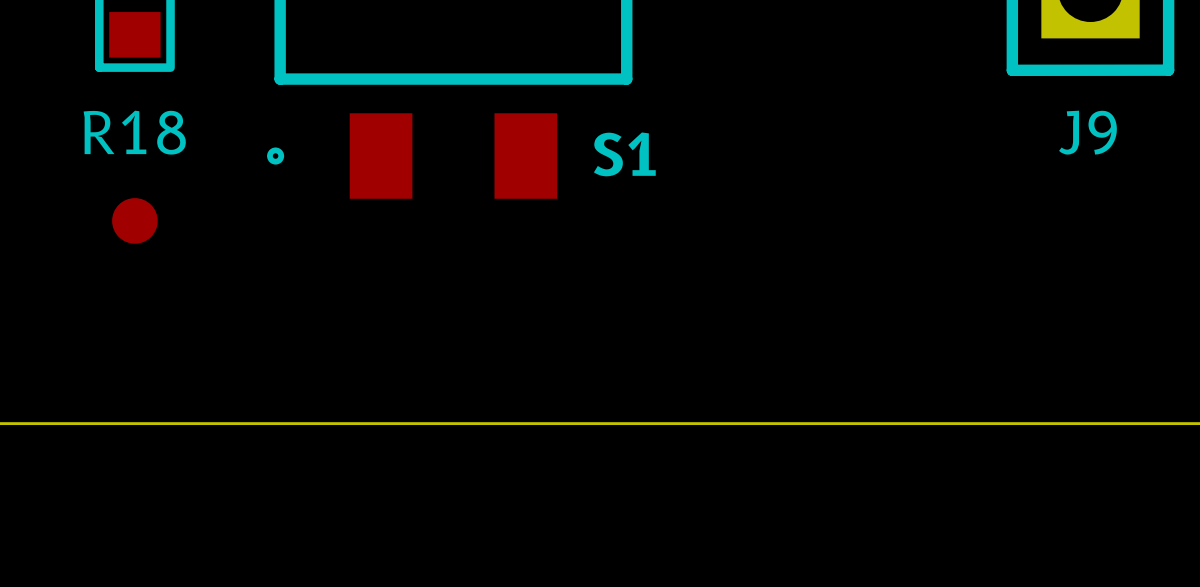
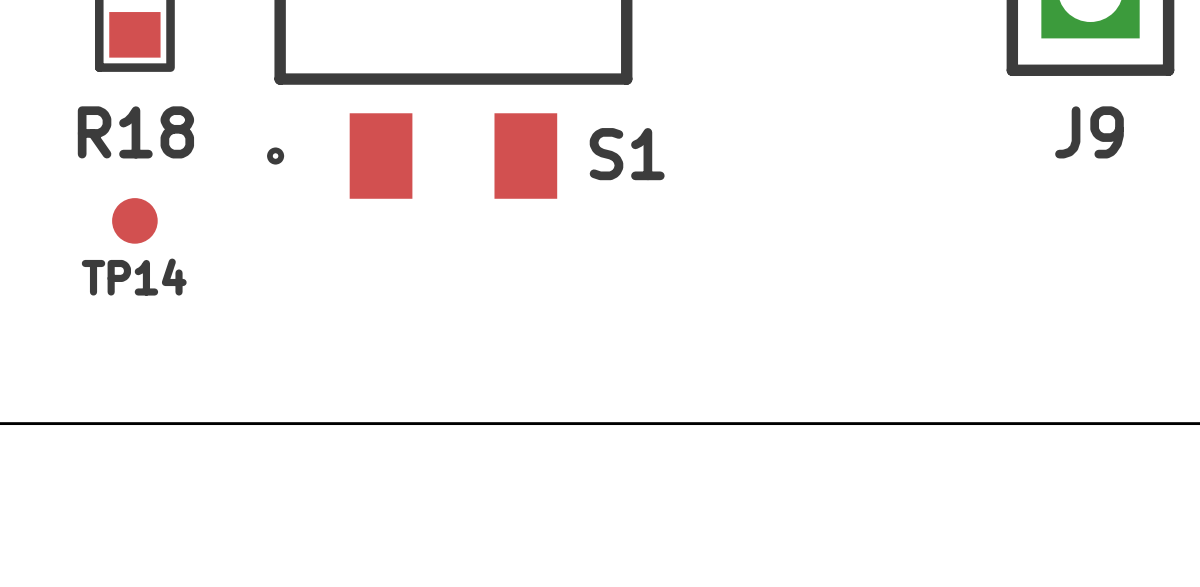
part text: none -> TP14 (134, 277)

